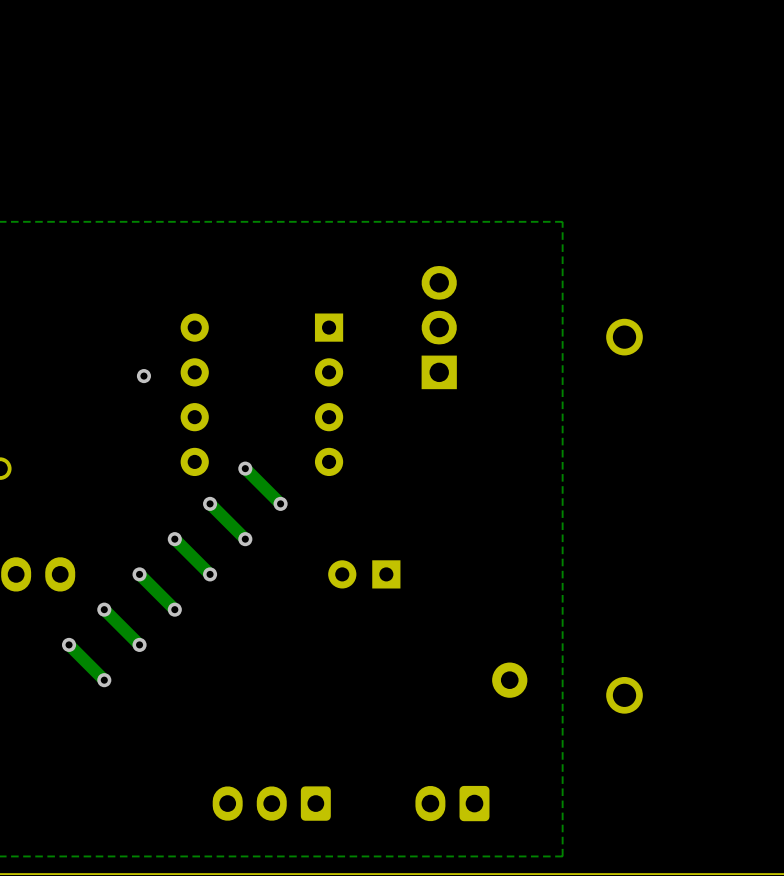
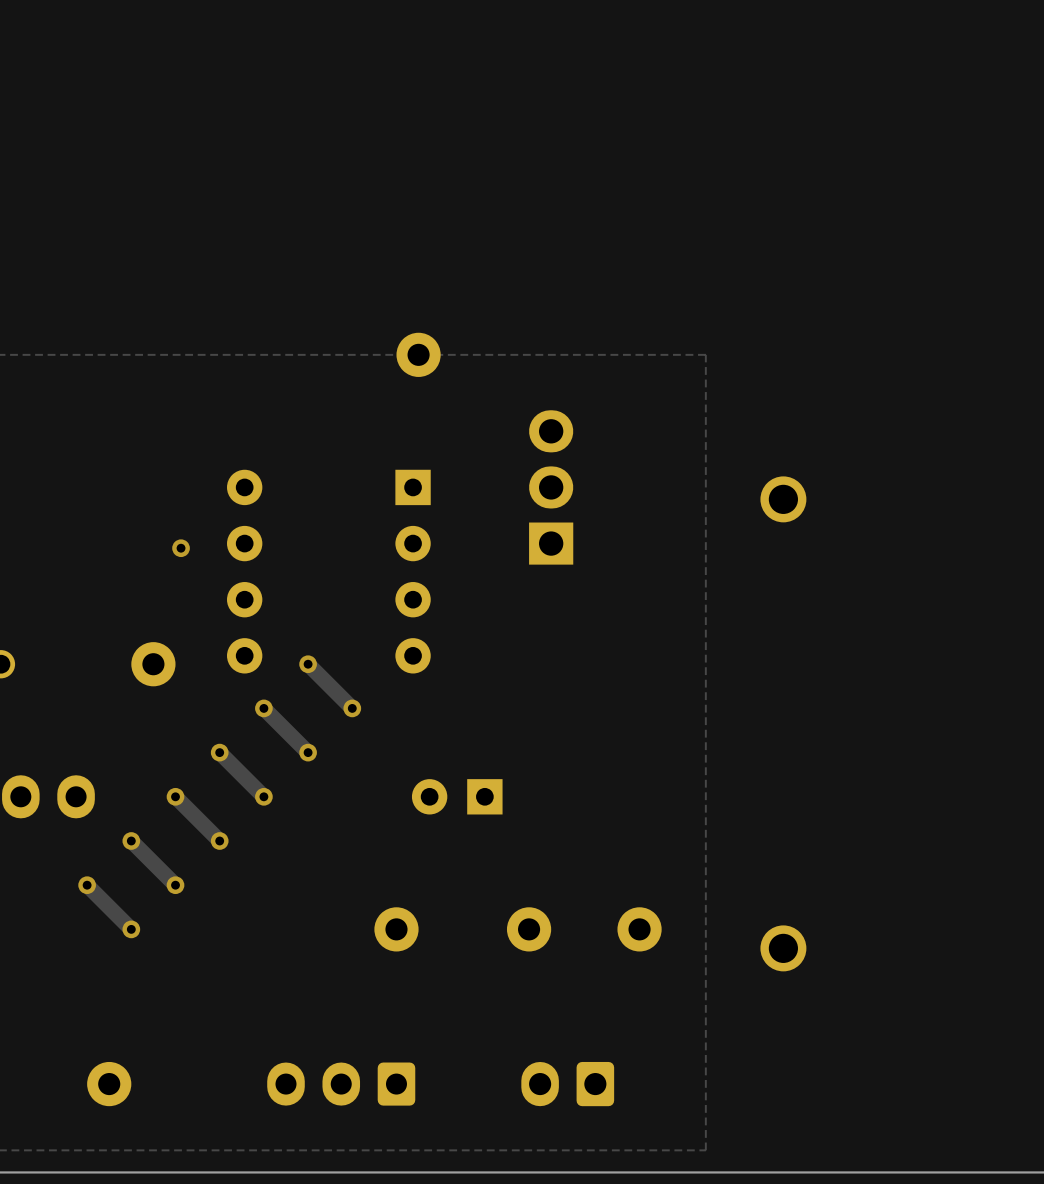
part: none -> (418, 354)
part: none -> (153, 664)
part: none -> (396, 929)
part: none -> (529, 929)
part: none -> (109, 1084)

